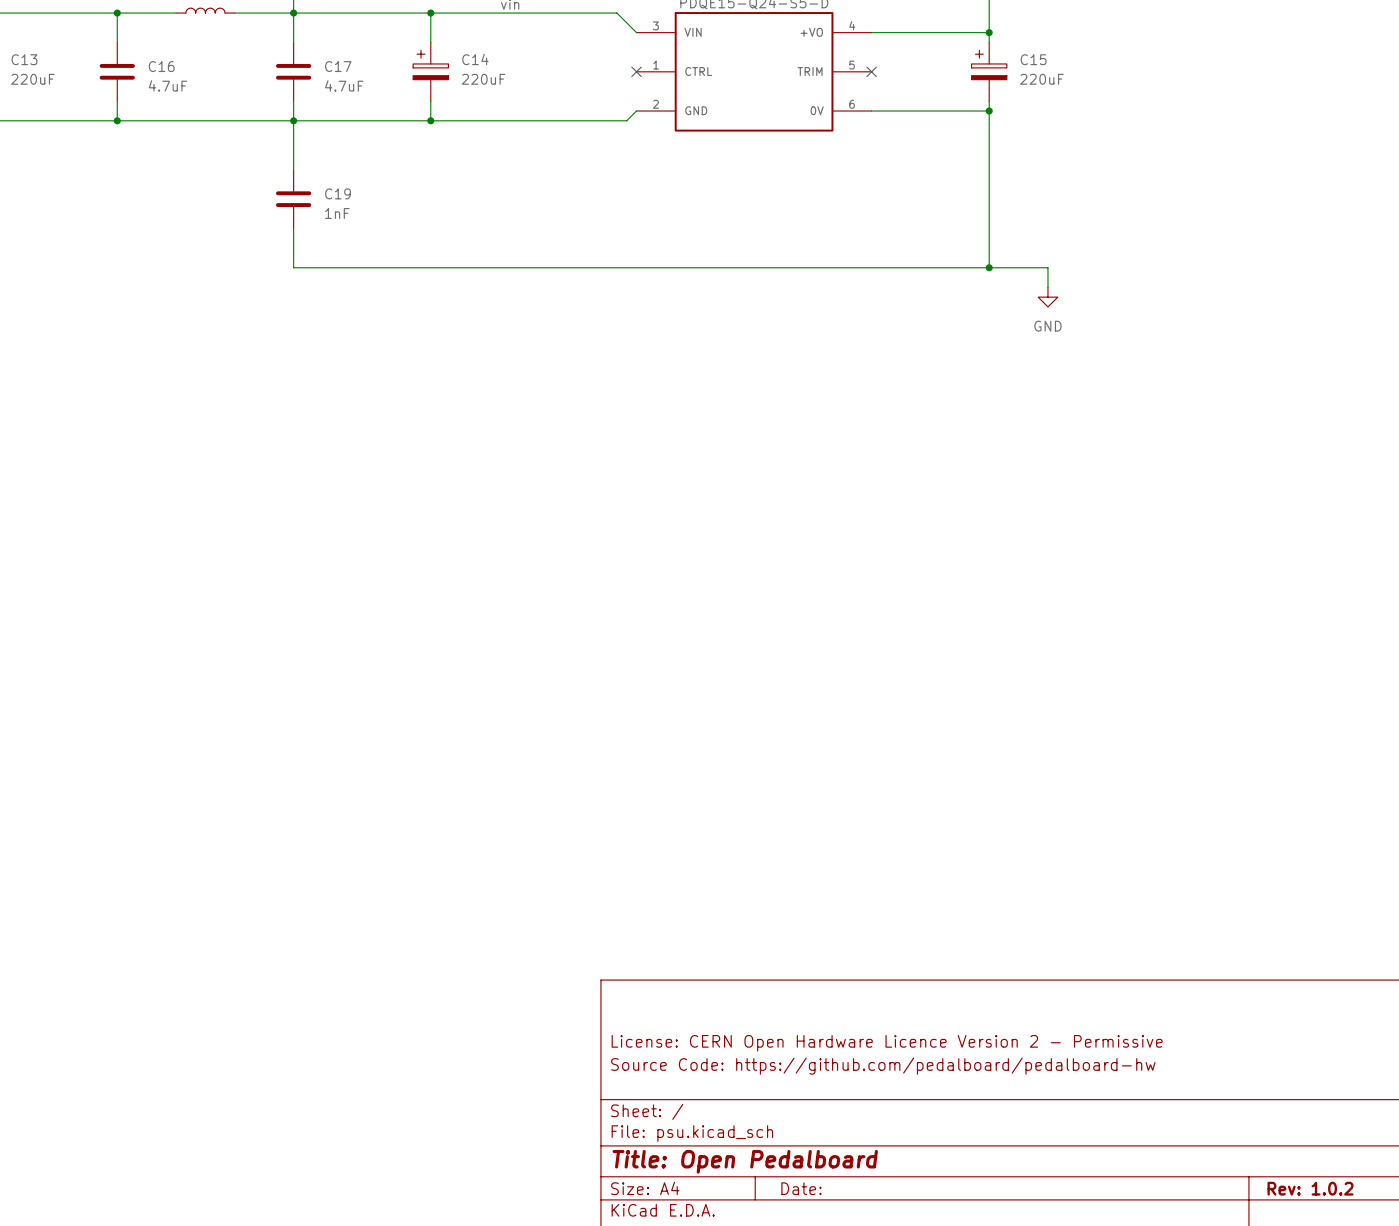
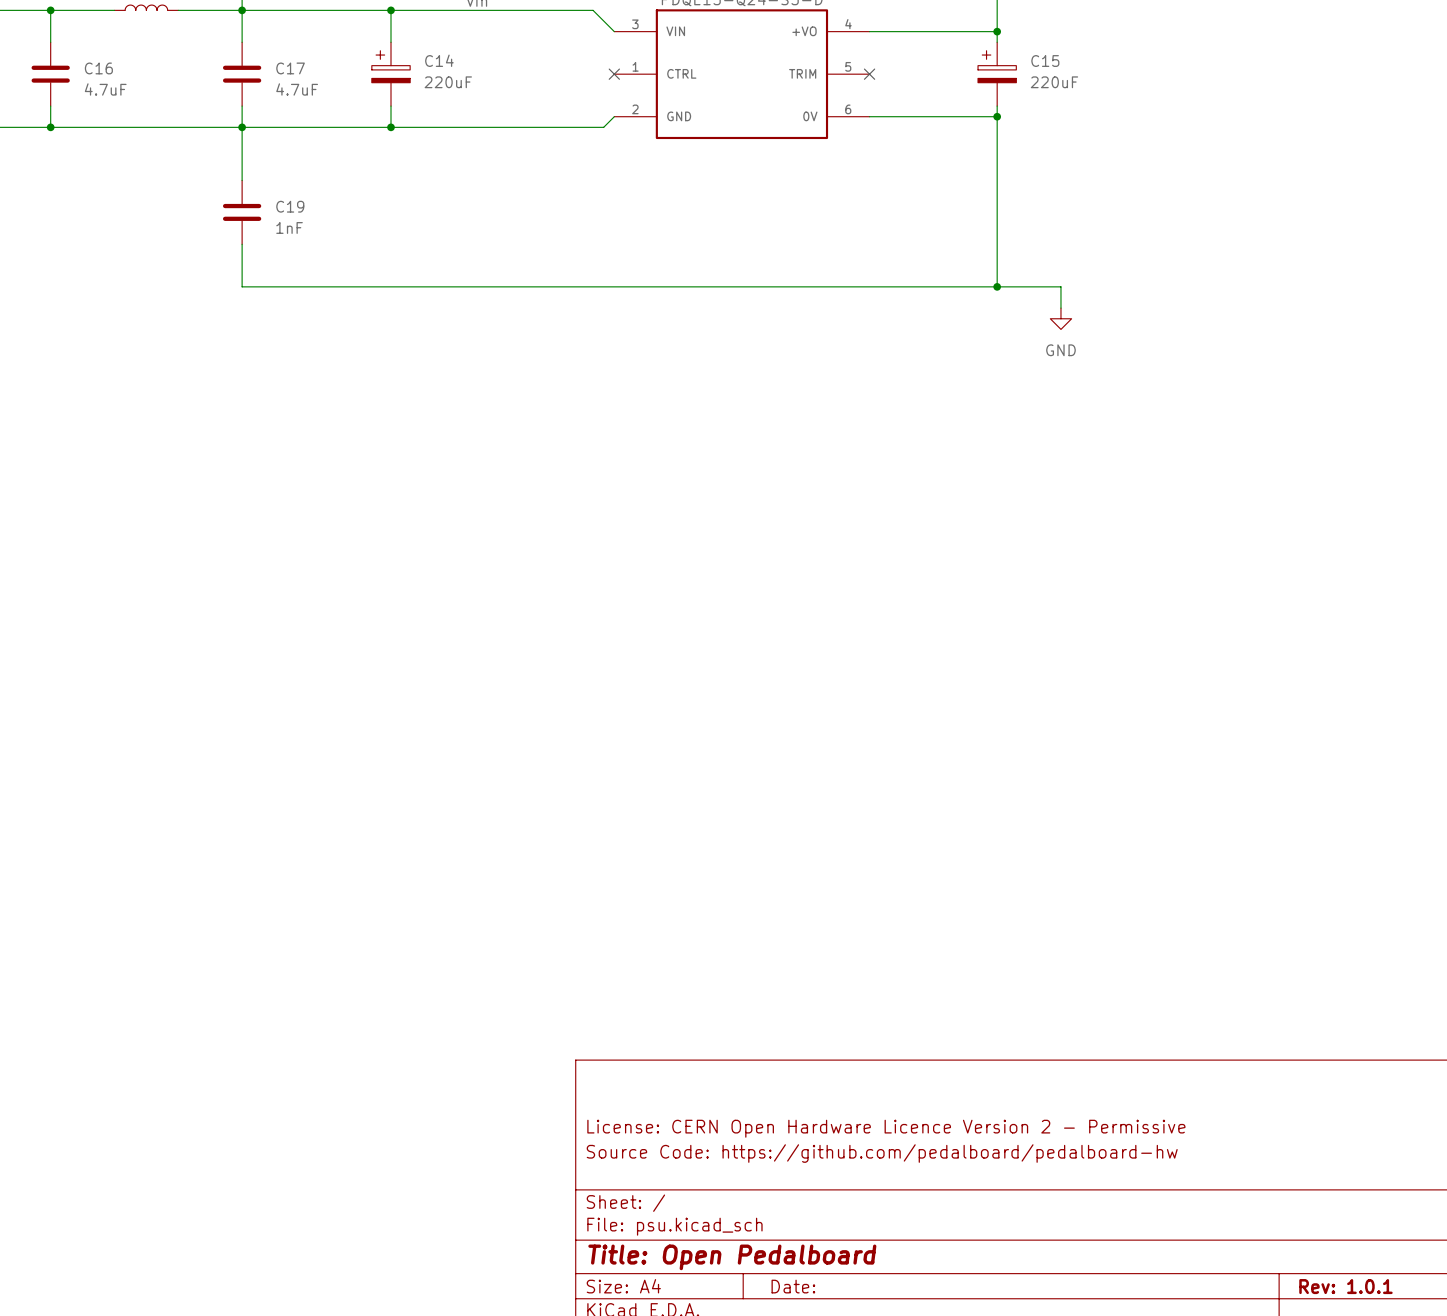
title block: Rev: 1.0.2 (1310, 1188) -> Rev: 1.0.1 (1345, 1286)

